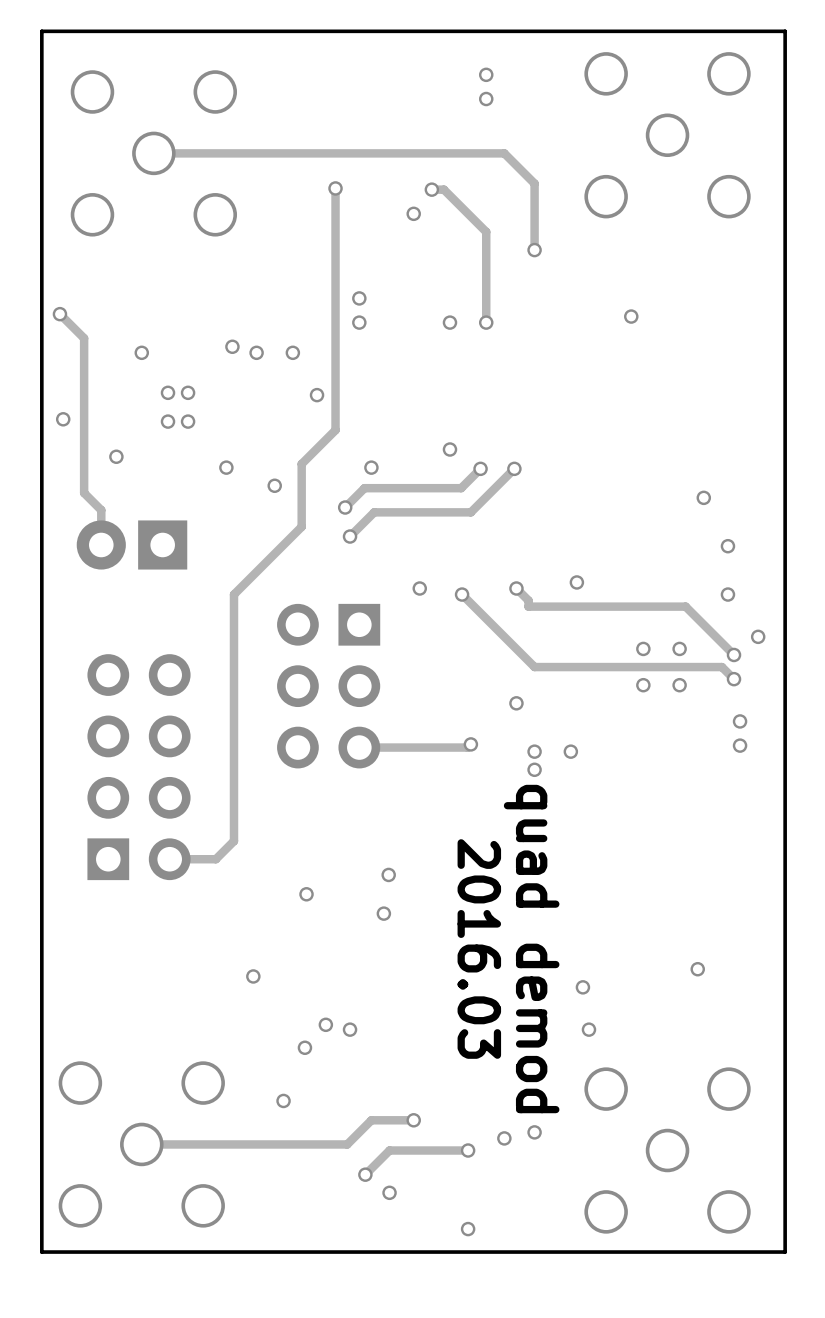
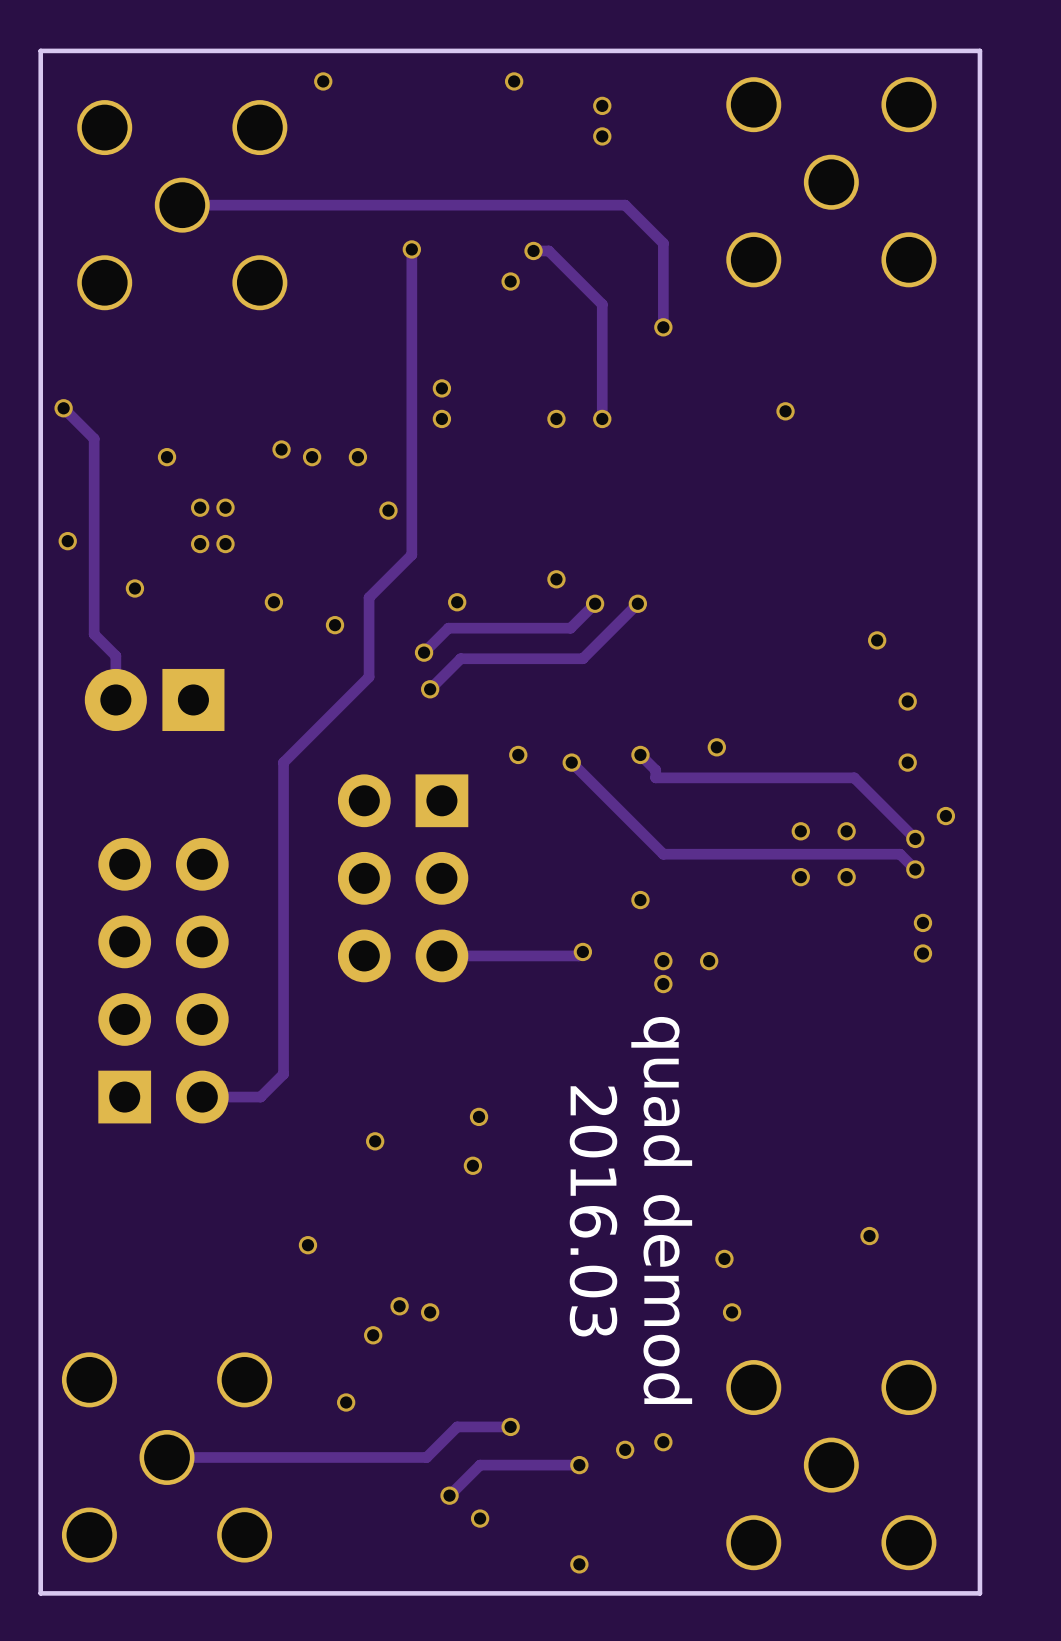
via: none -> (323, 81)
via: none -> (514, 81)

